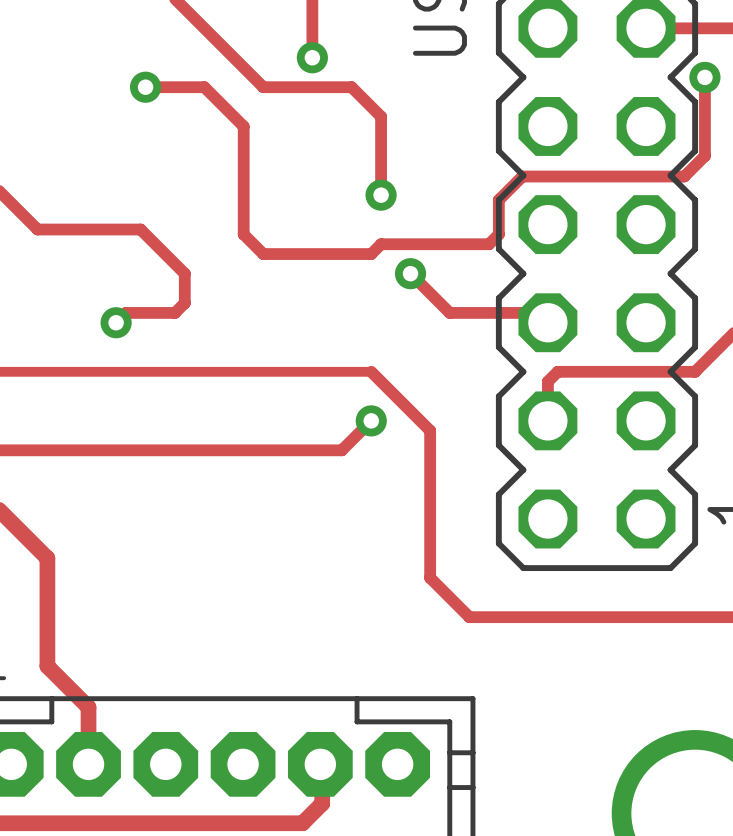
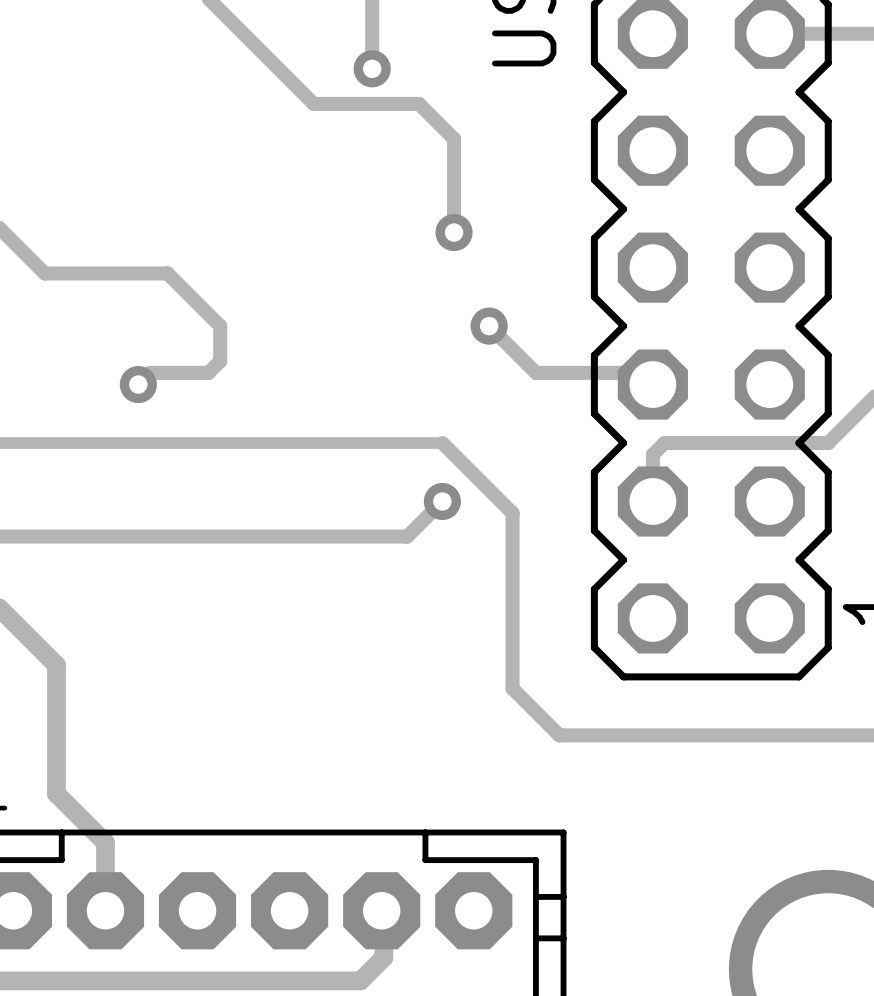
track: (704, 77) (704, 155) (684, 176) (522, 176) (498, 200) (498, 234) (489, 244) (381, 244) (371, 254) (263, 254) (243, 234) (243, 126) (204, 87) (145, 87) -> none
via: (704, 77) -> none
via: (145, 87) -> none

